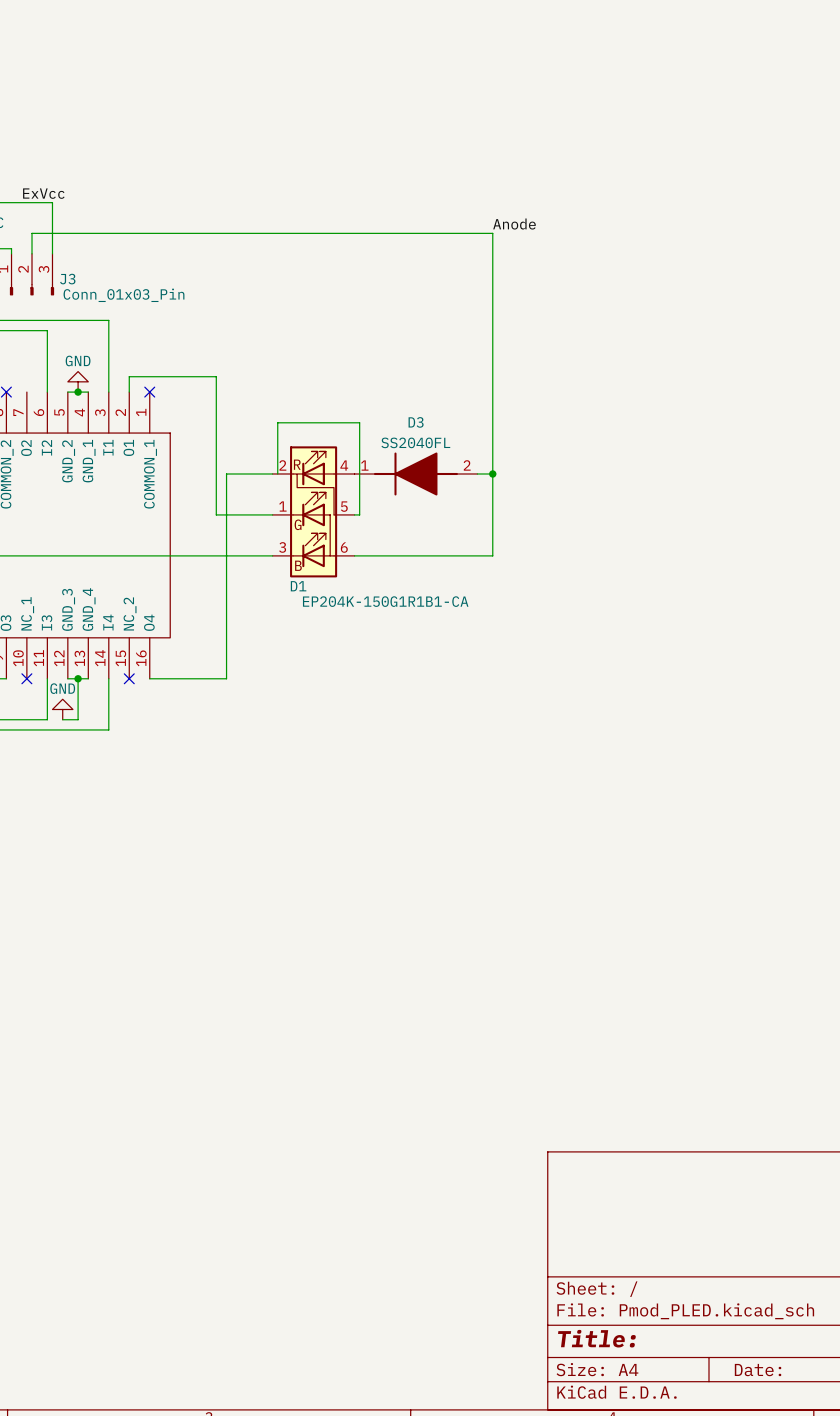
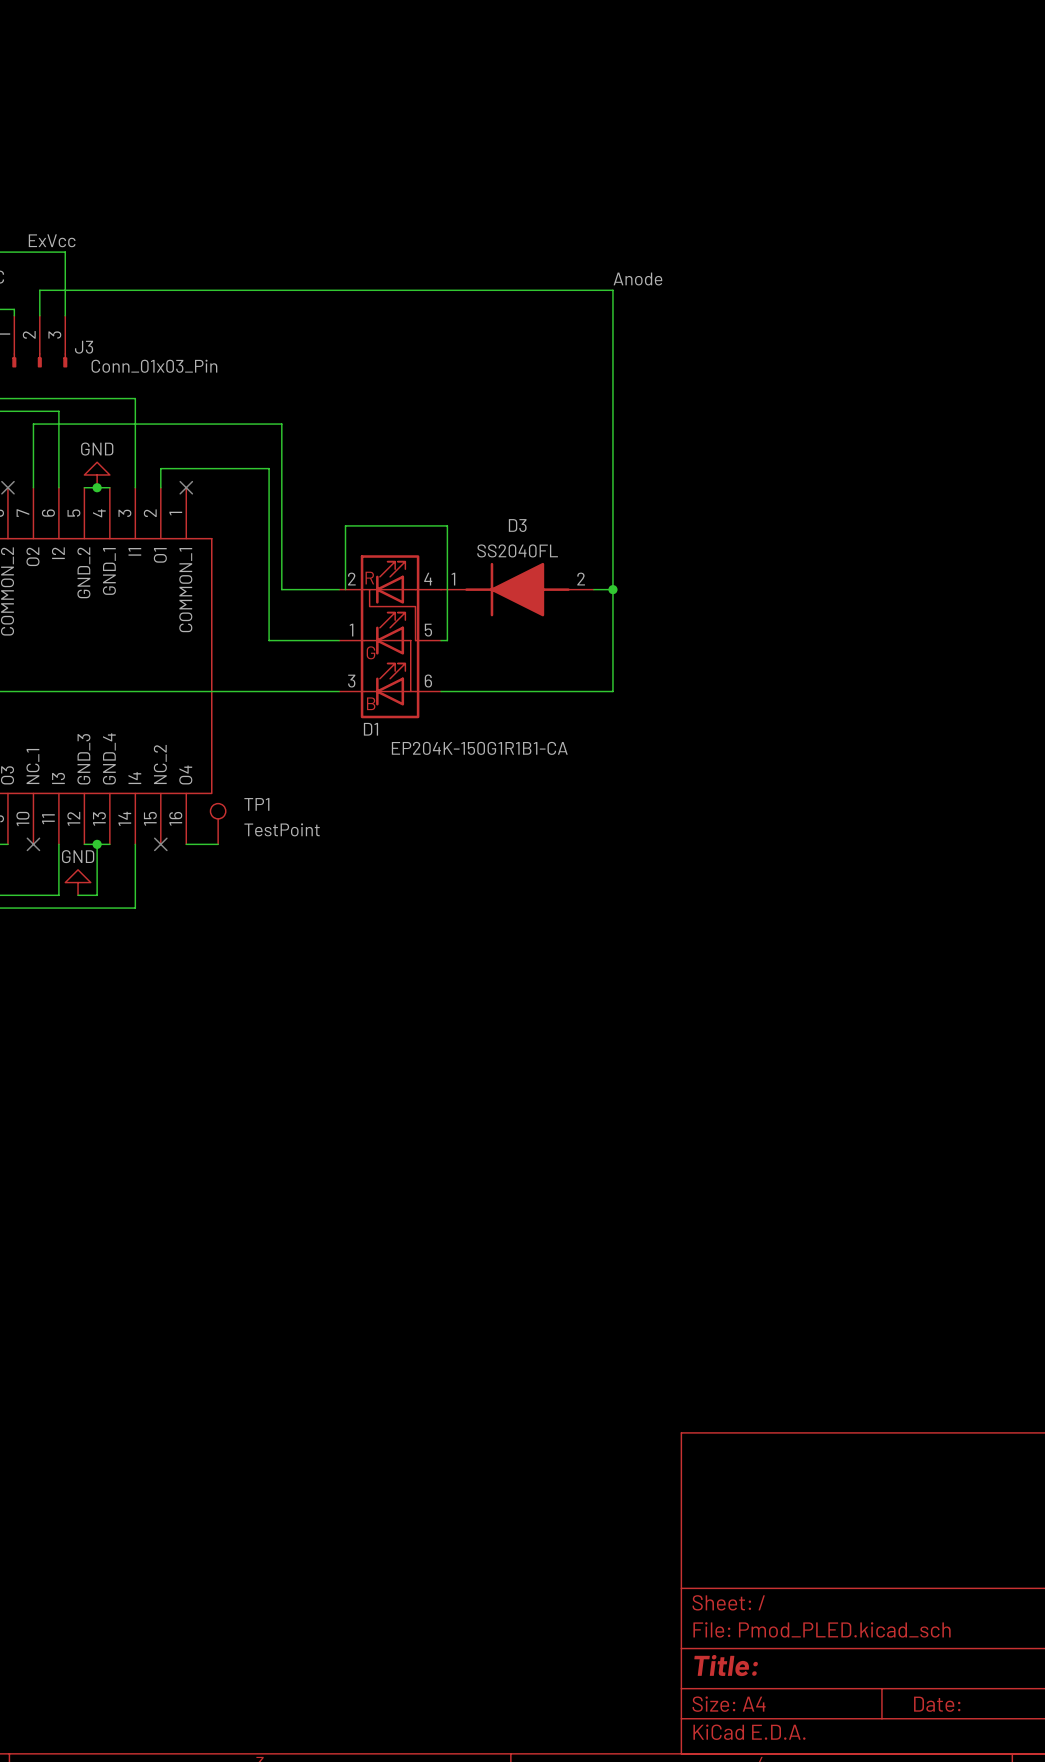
wire: (226, 473) (226, 678) (175, 678) -> (281, 589) (281, 424) (33, 424) (33, 487)
TP1: none -> TestPoint (218, 823)

